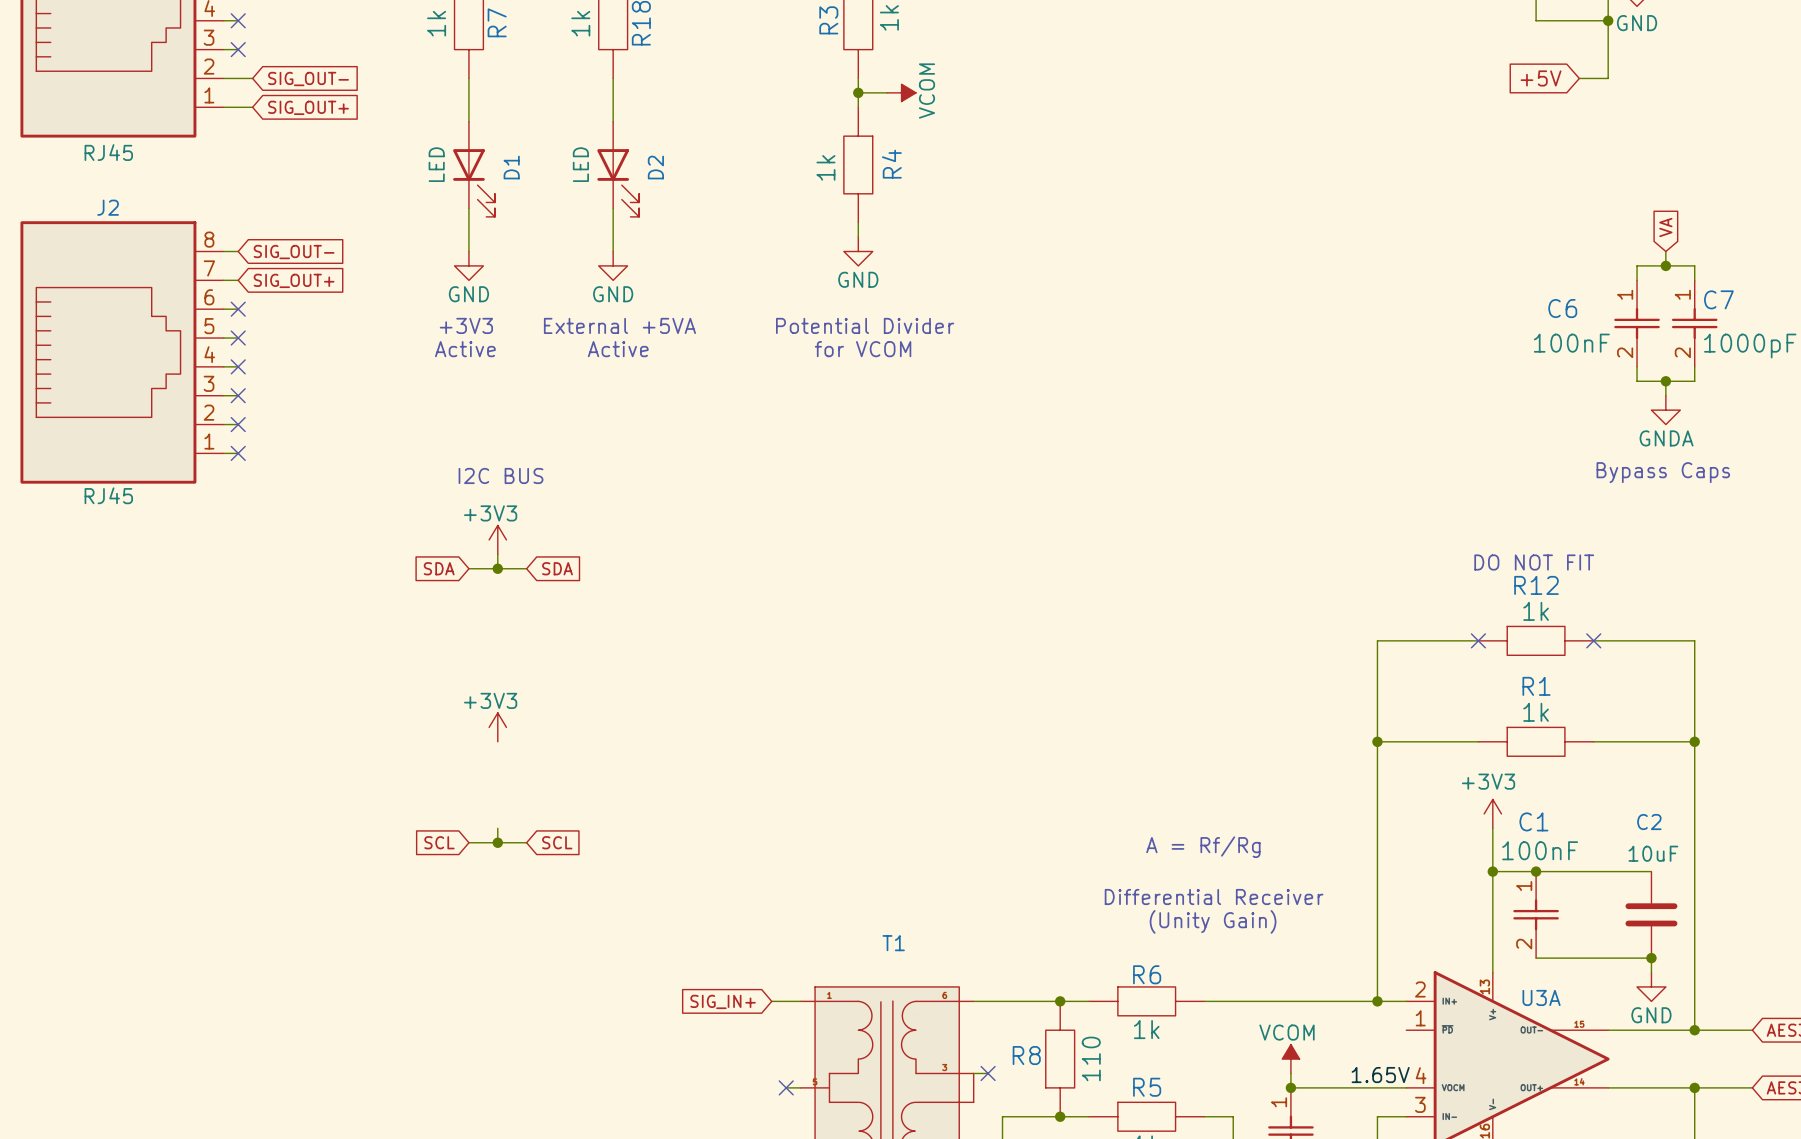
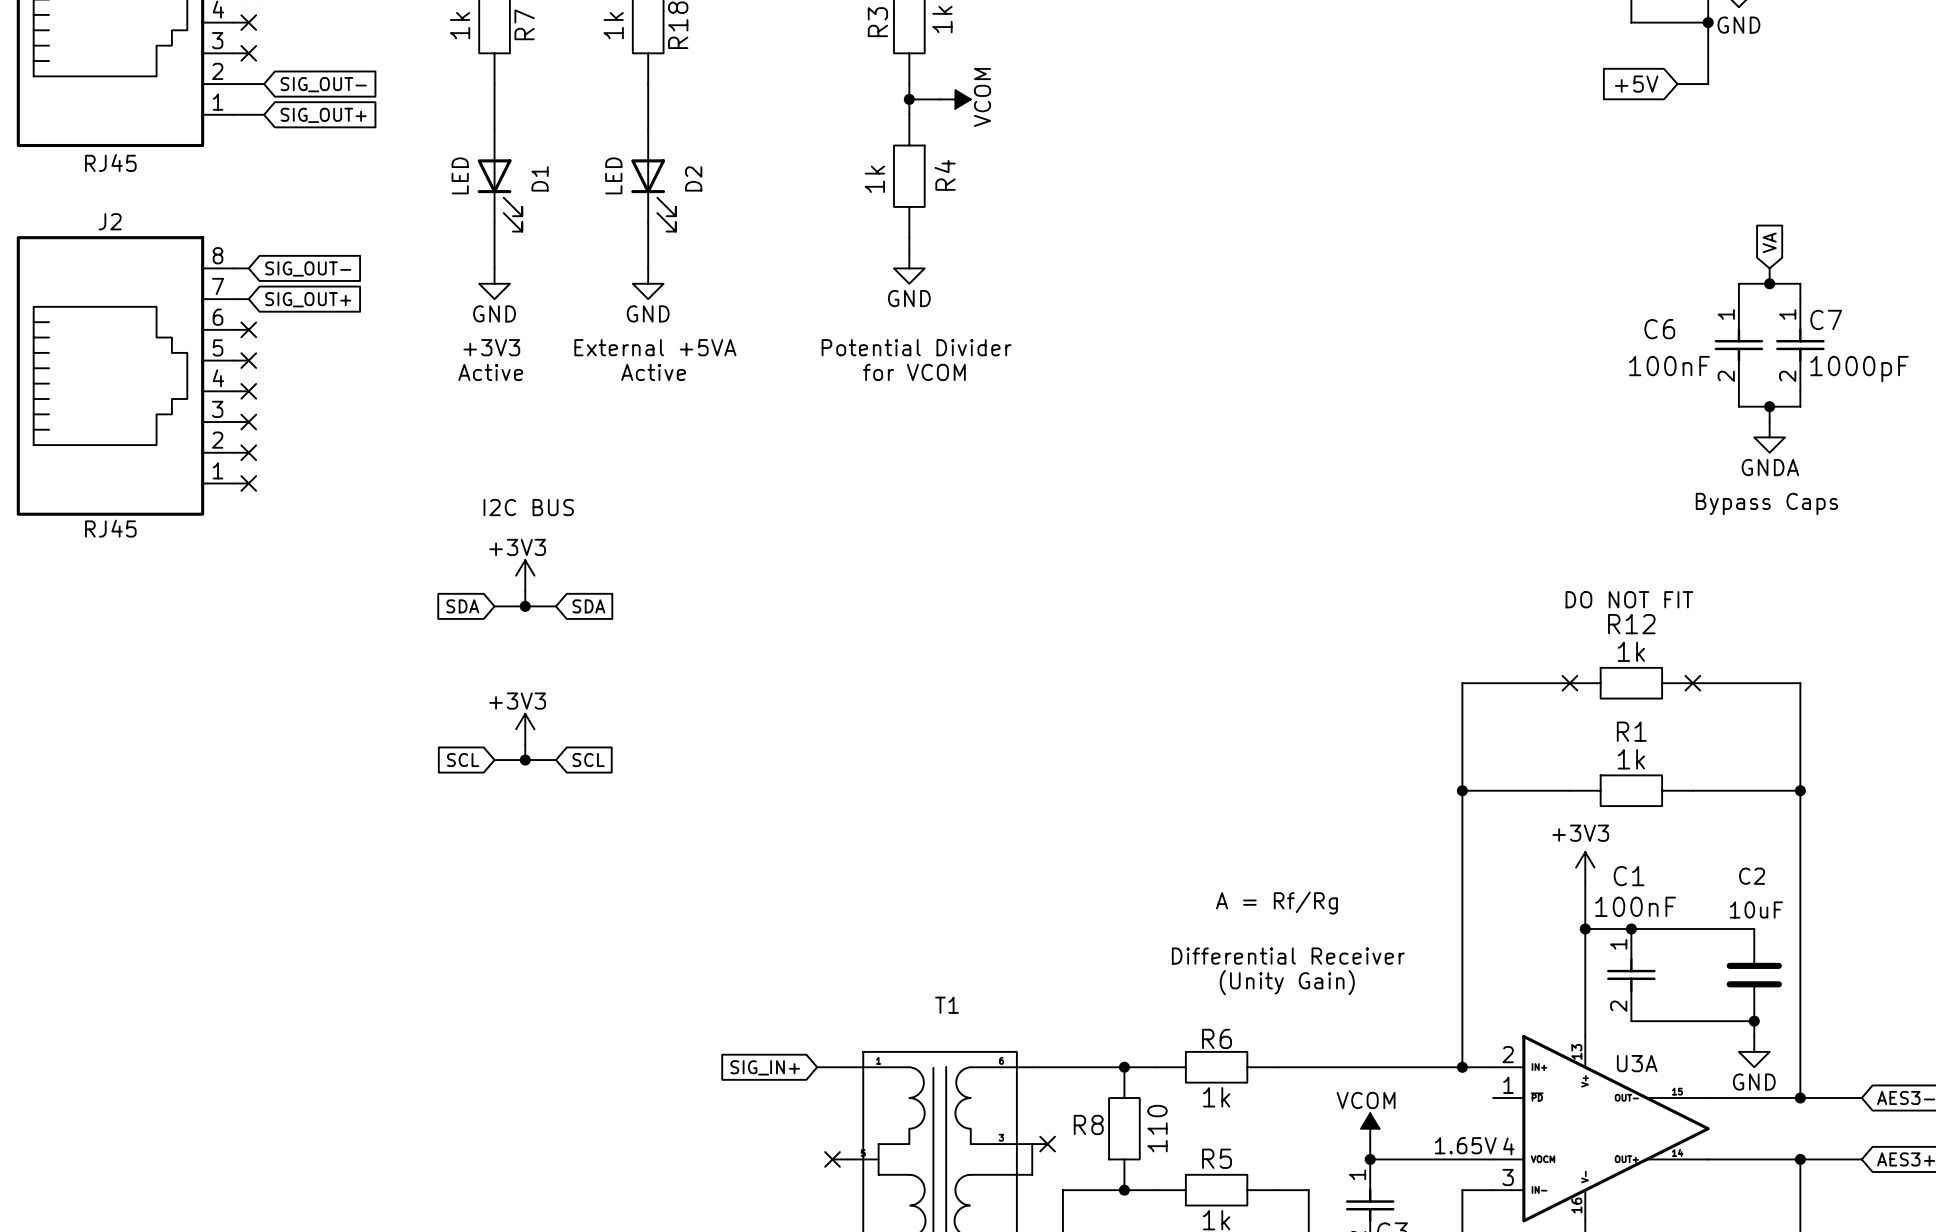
global label: none -> SCL (463, 760)
junction: none -> (525, 760)
global label: none -> SCL (588, 760)
power symbol position: +3V3 (497, 727) -> +3V3 (525, 729)
wire: (497, 828) (497, 842) -> (525, 744) (525, 760)
global label: SCL (439, 842) -> none
wire: (468, 842) (526, 842) -> (494, 760) (556, 760)
junction: (497, 842) -> none
global label: SCL (557, 842) -> none

